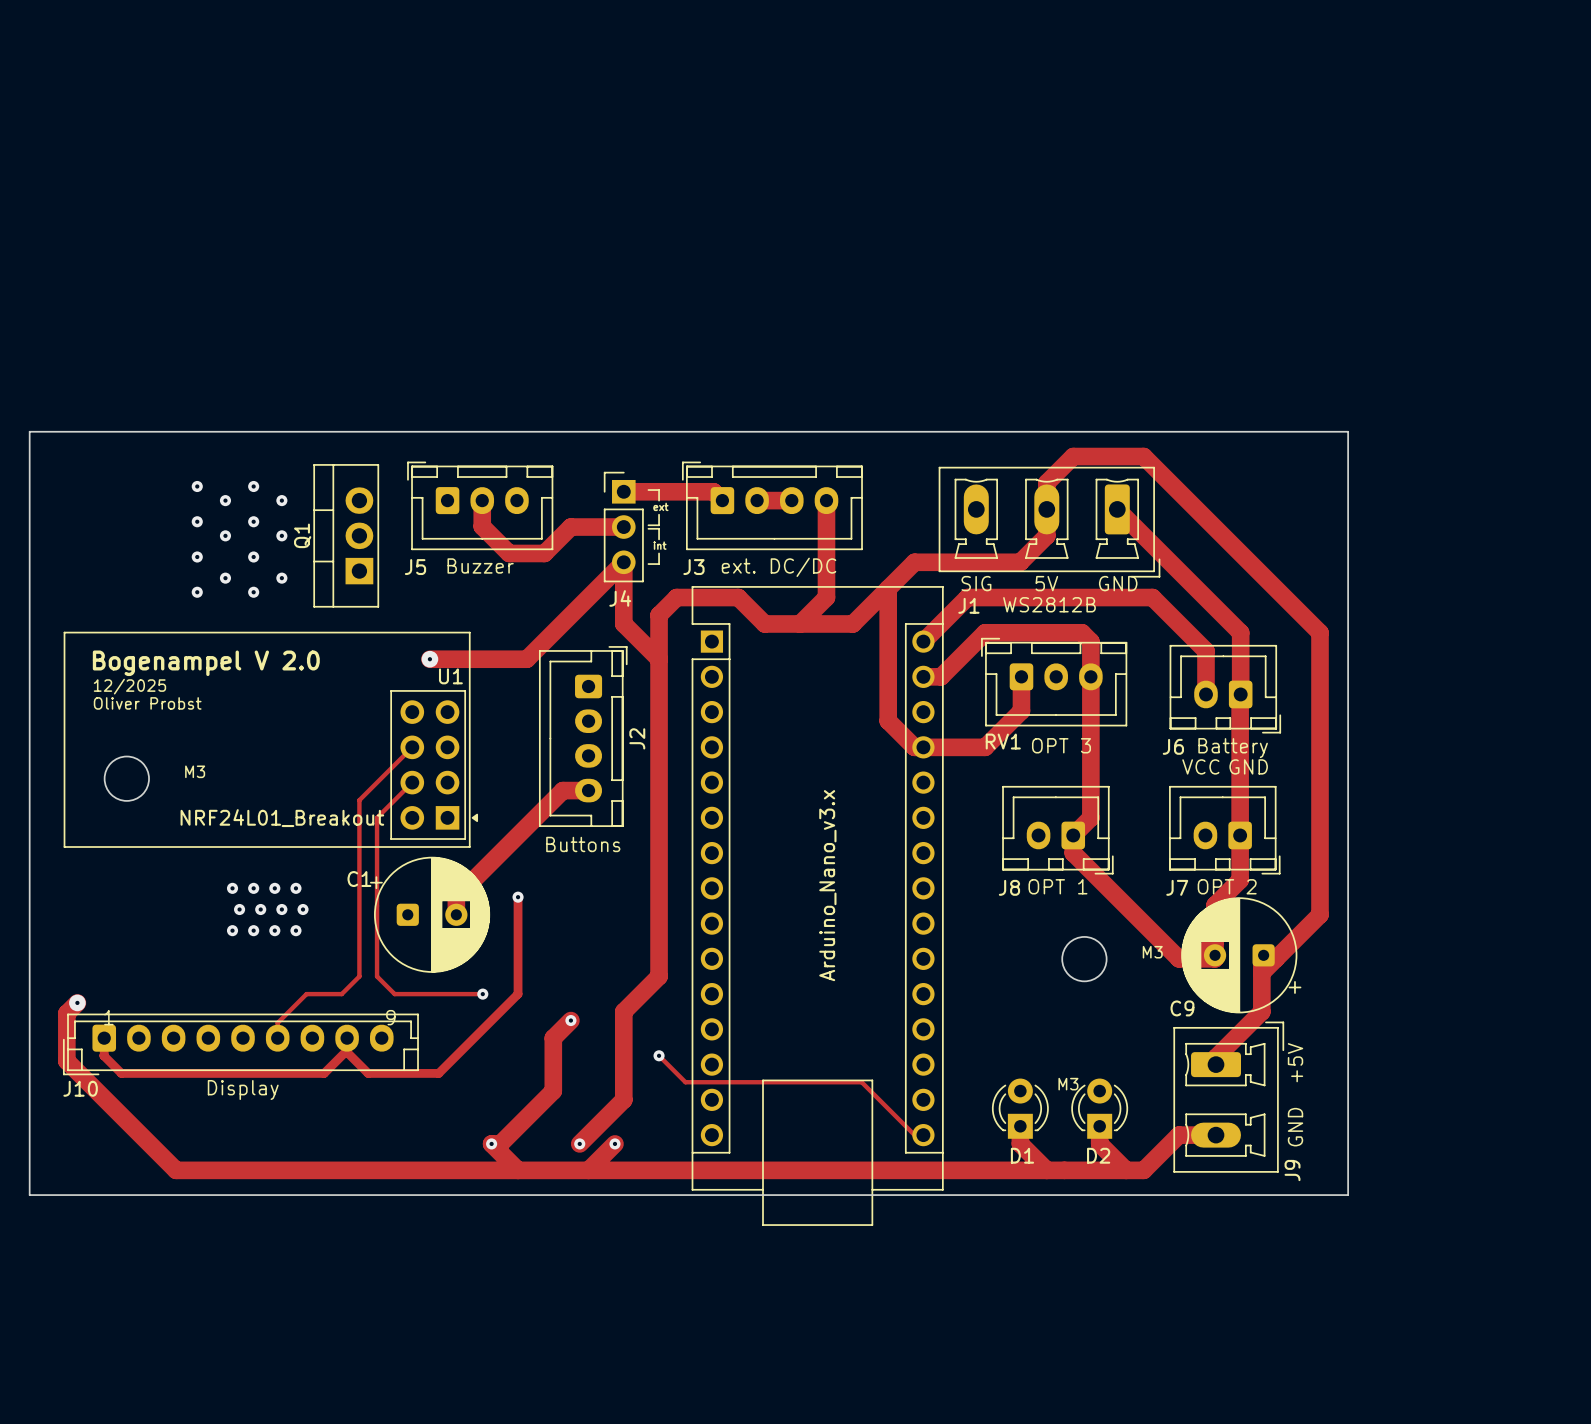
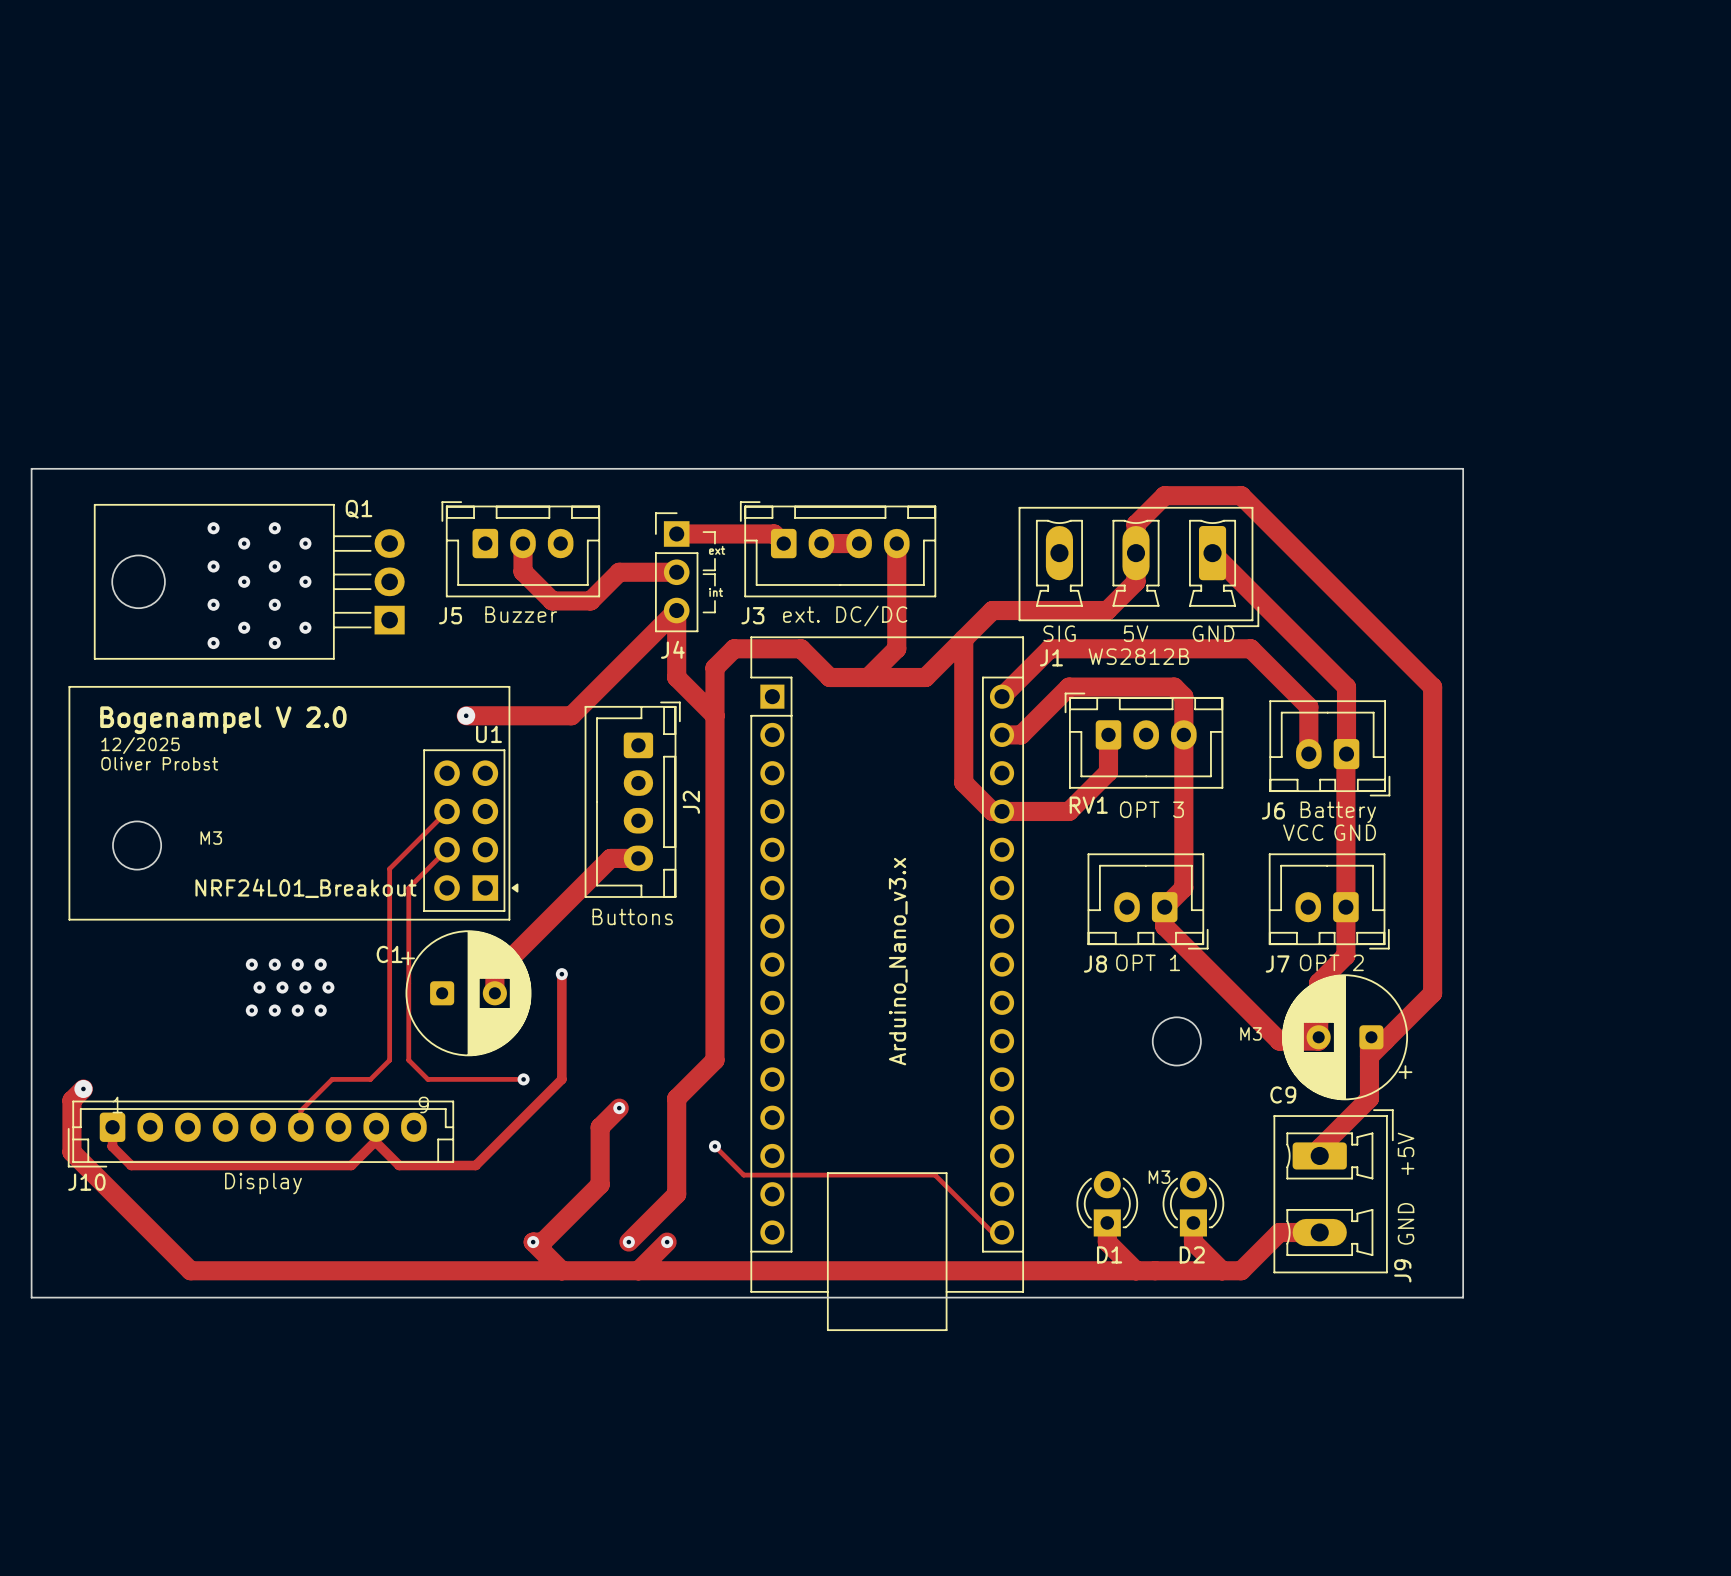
Q1 footprint: [313, 464, 380, 608] -> [93, 503, 405, 660]
Q1 name position: Q1 (302, 535) -> Q1 (359, 509)

